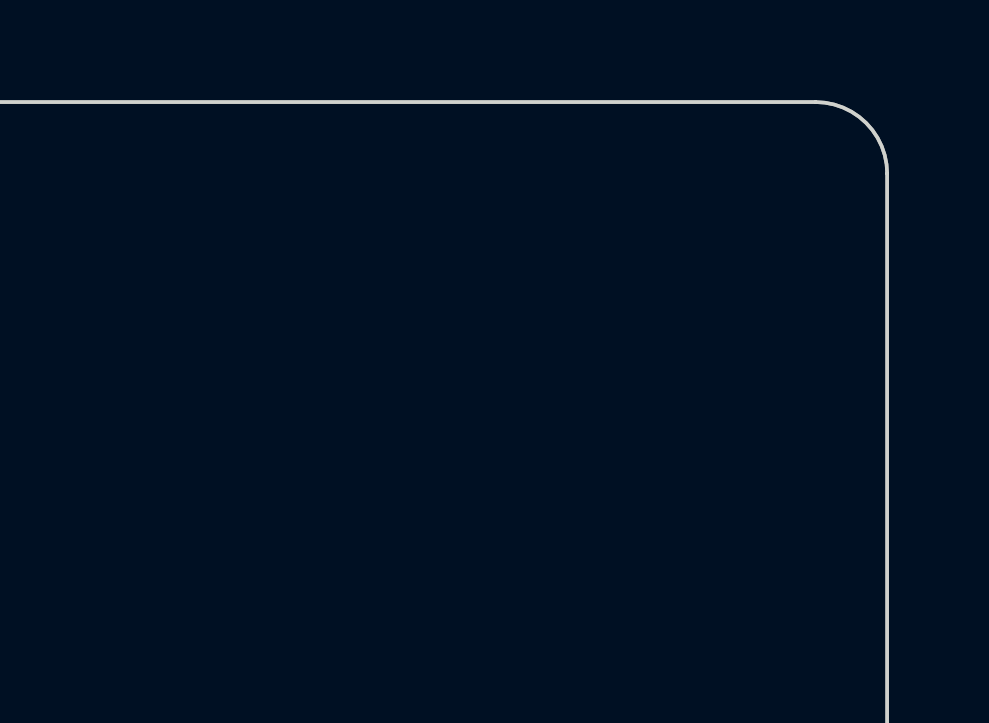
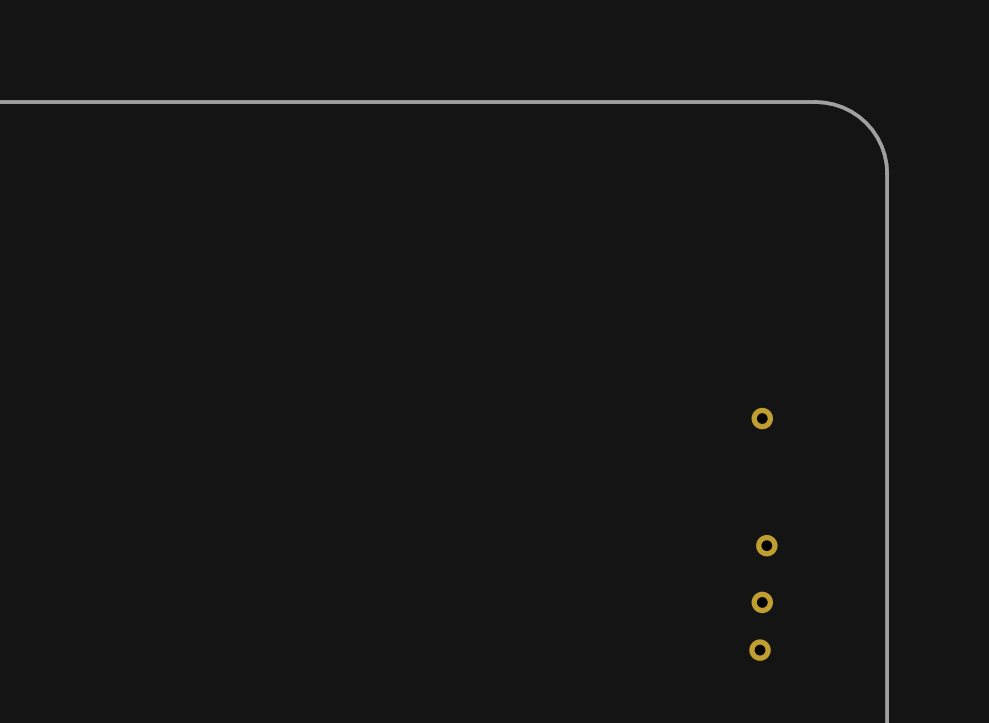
via: none -> (762, 418)
via: none -> (766, 545)
via: none -> (762, 602)
via: none -> (760, 650)

